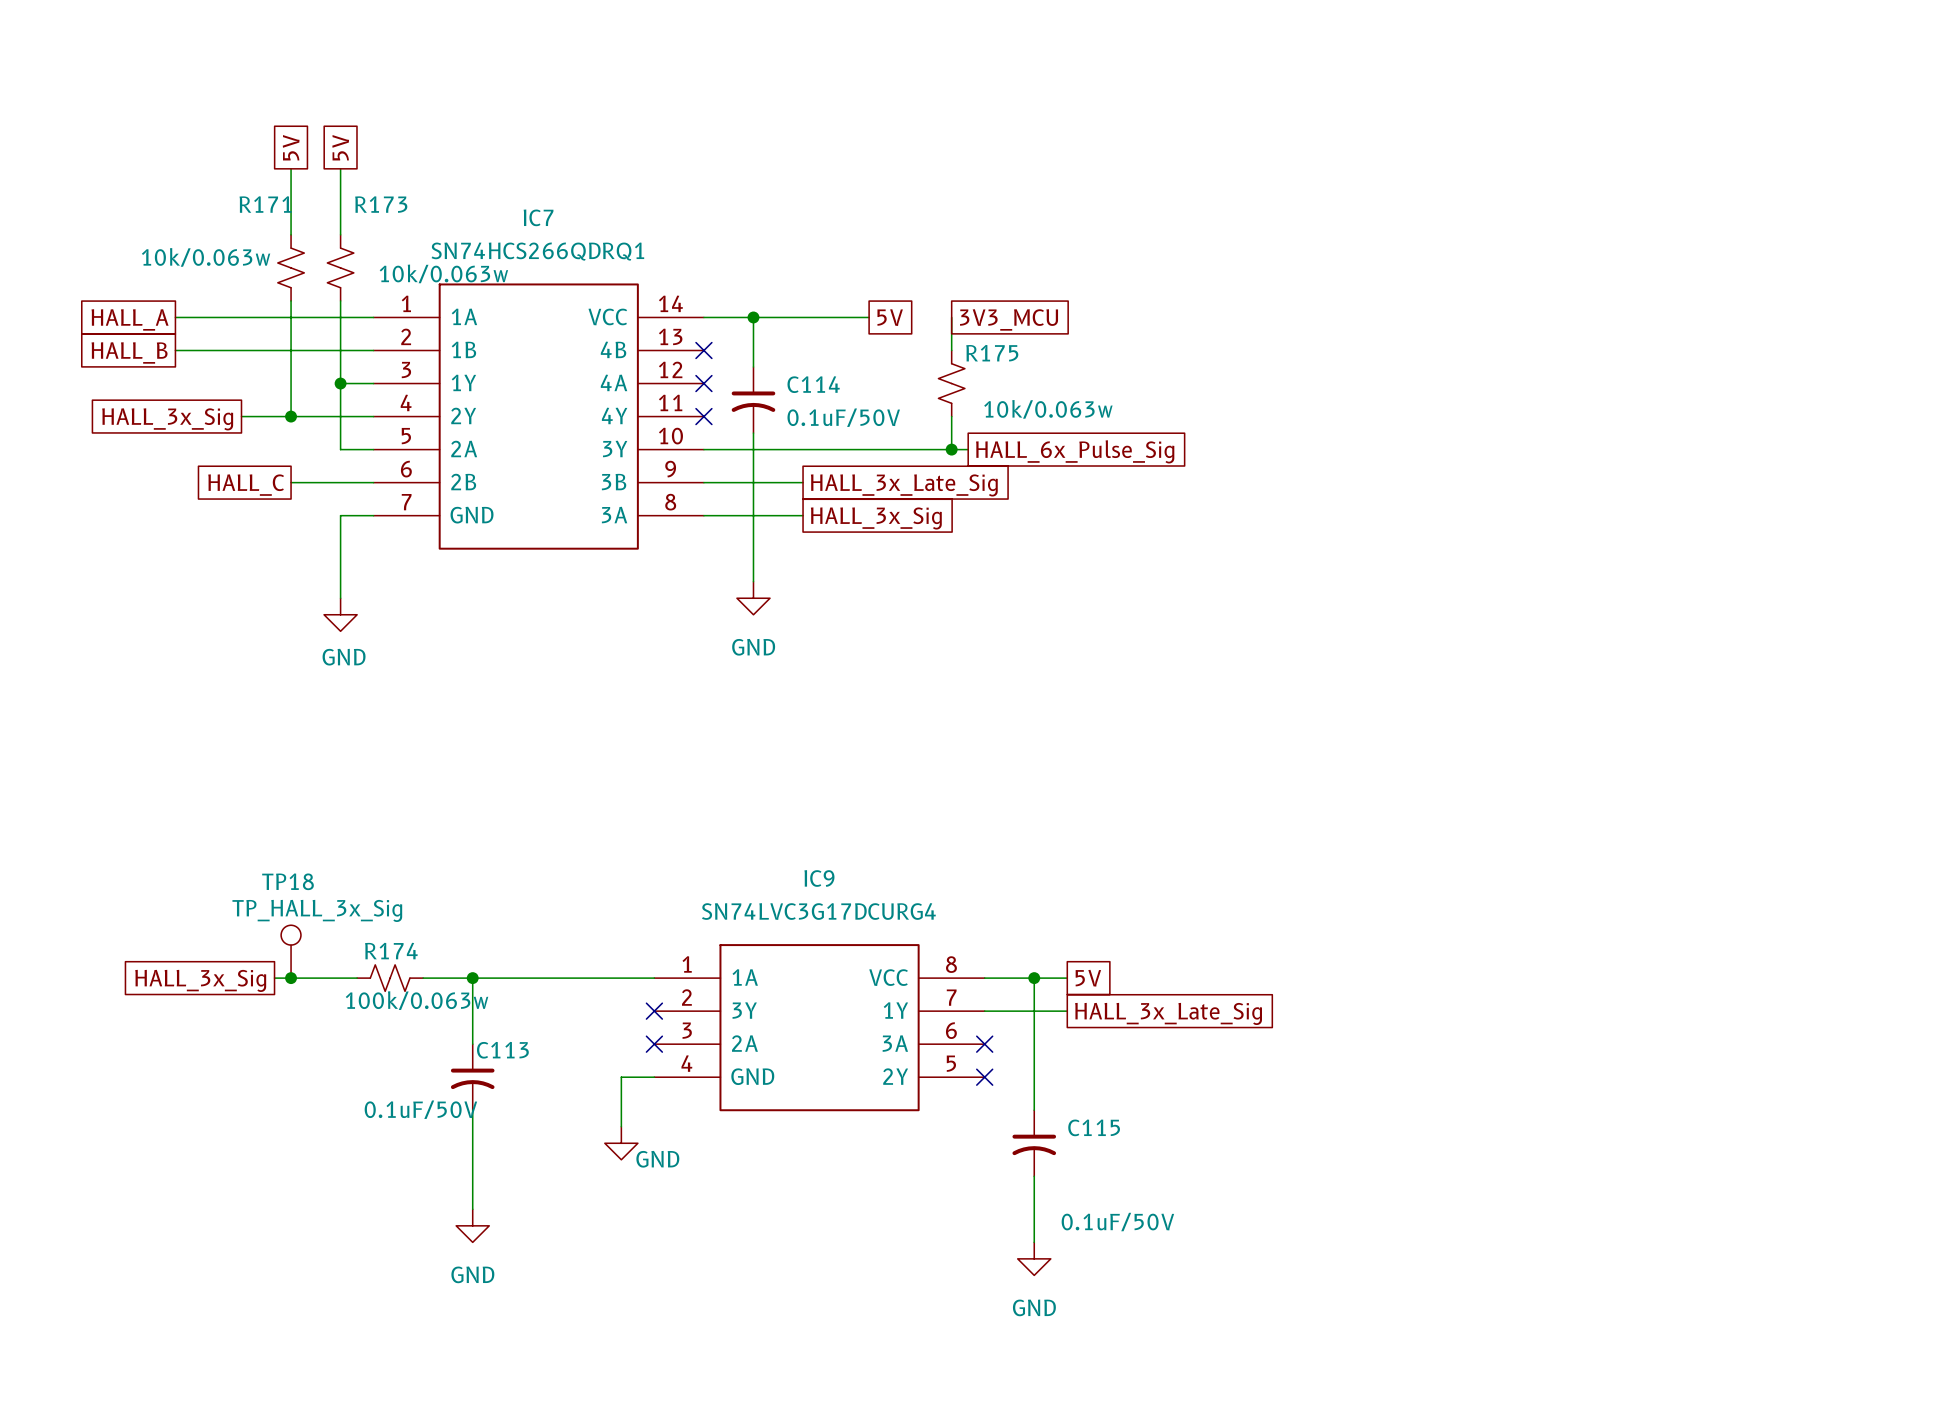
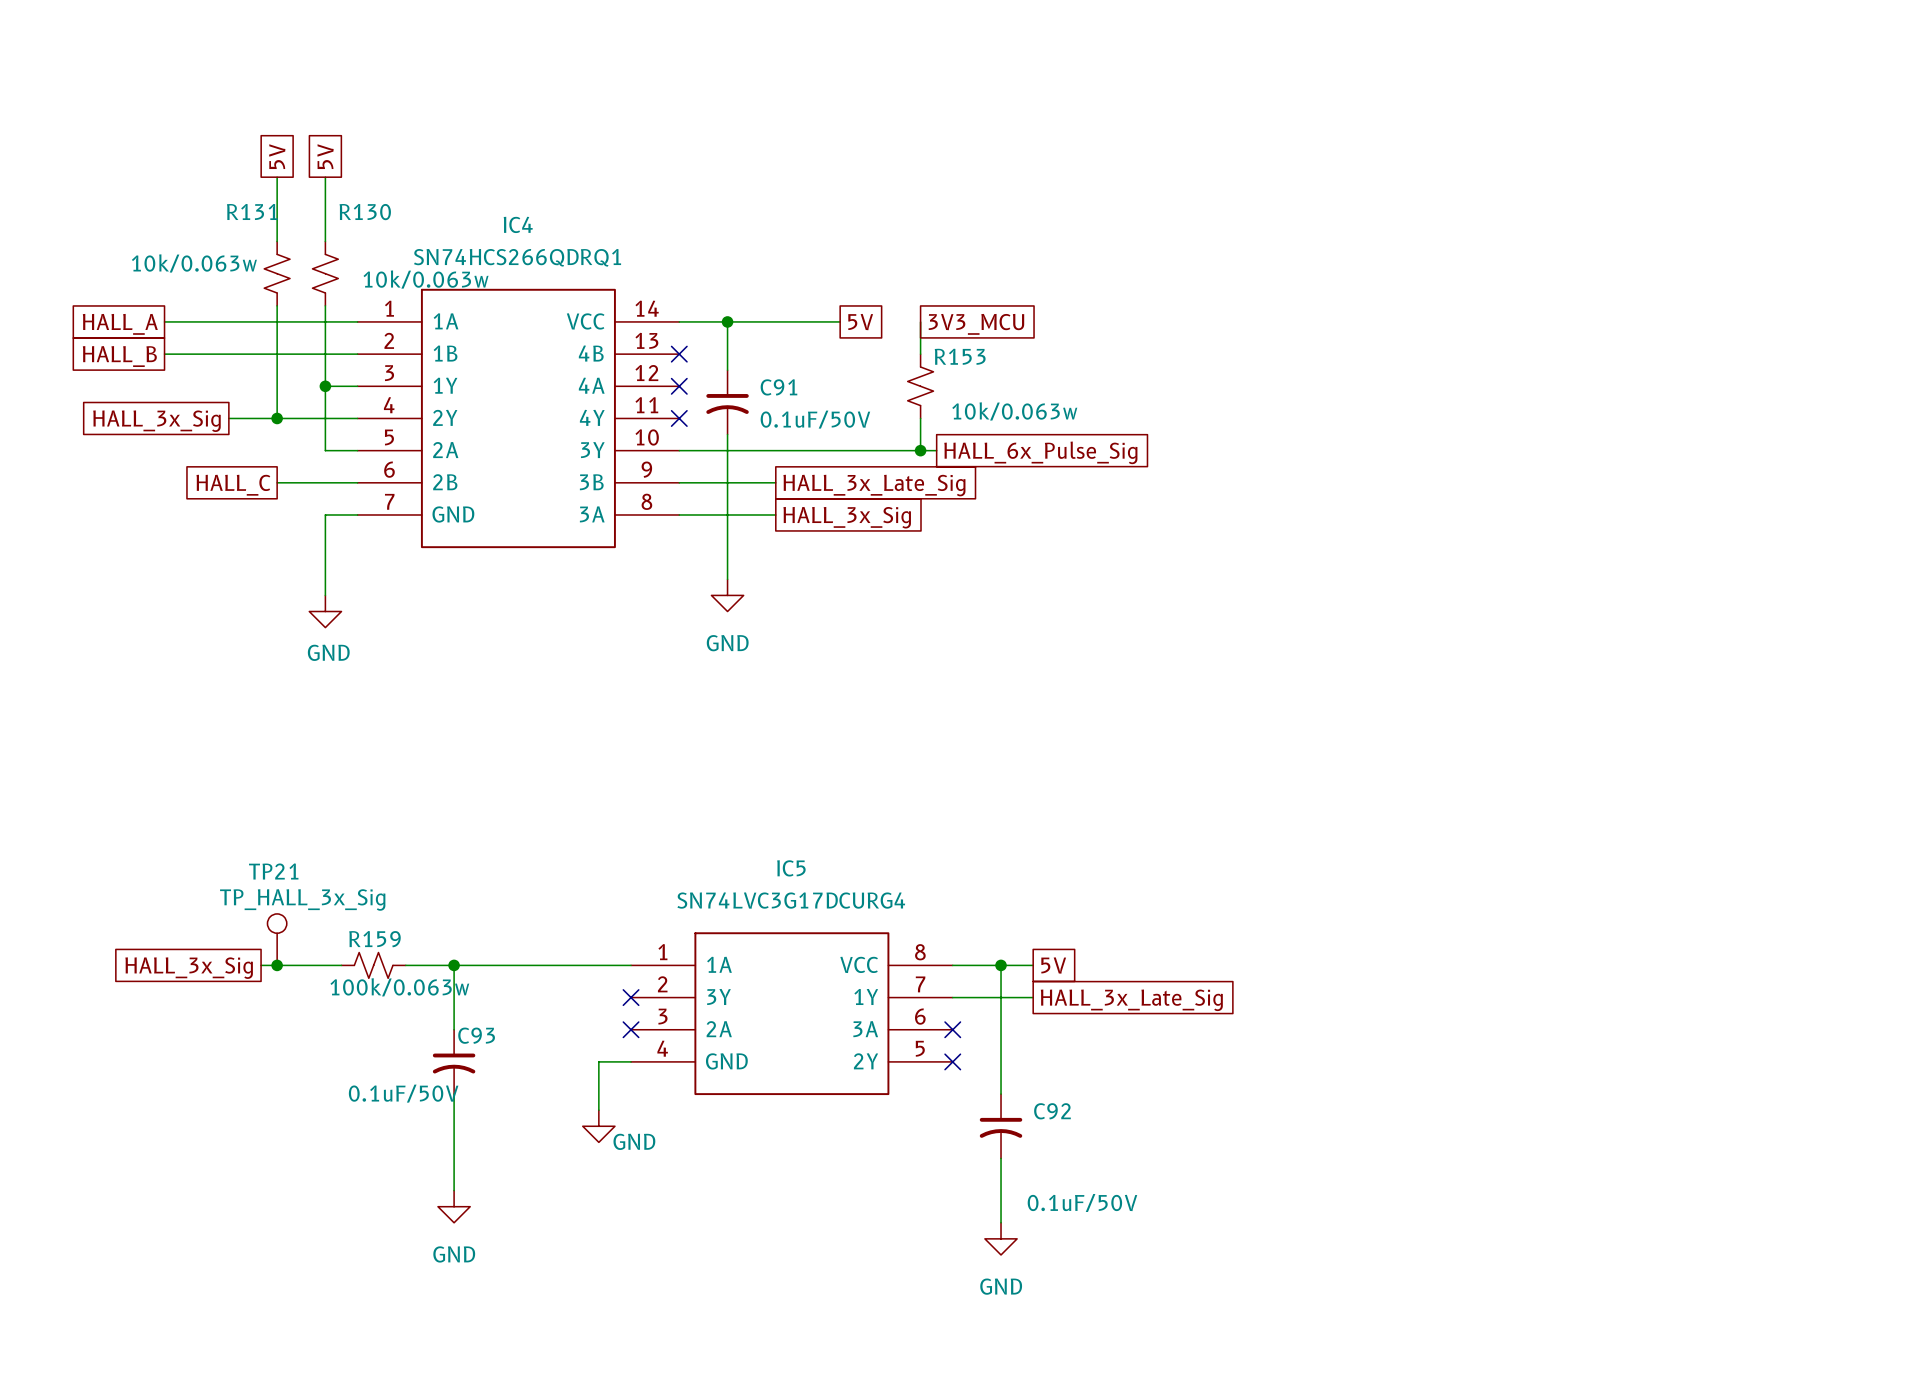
R171 name: R171 (265, 204) -> R131 (252, 211)
R173 name: R173 (381, 204) -> R130 (365, 212)
IC7 name: IC7 (538, 217) -> IC4 (518, 224)
R175 name: R175 (992, 353) -> R153 (960, 356)
C114 name: C114 (813, 384) -> C91 (778, 387)
IC9 name: IC9 (819, 878) -> IC5 (791, 868)
TP18 name: TP18 (288, 881) -> TP21 (273, 871)
R174 name: R174 (391, 951) -> R159 (374, 939)
C113 name: C113 (502, 1050) -> C93 (476, 1035)
C115 name: C115 (1094, 1127) -> C92 (1052, 1111)

